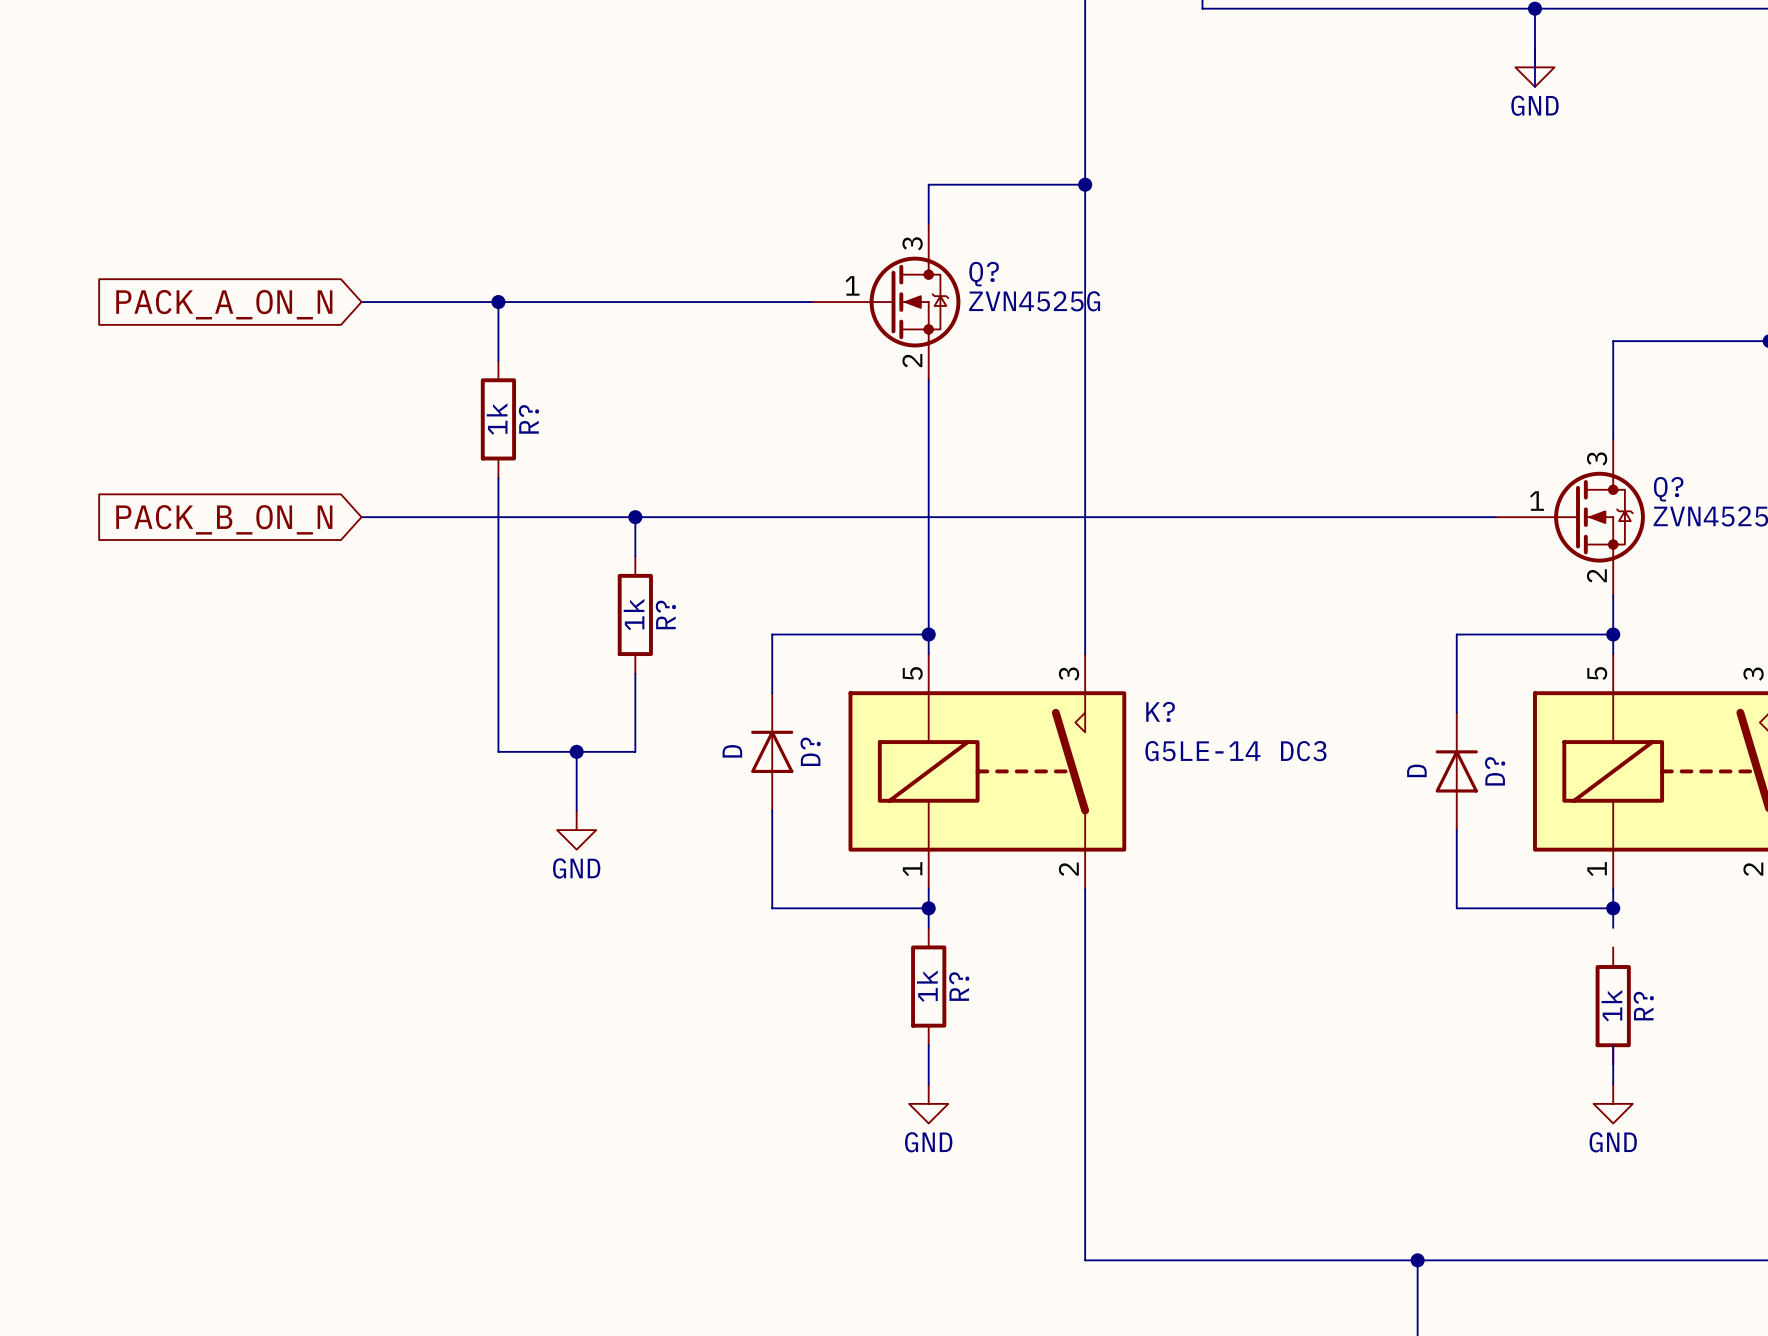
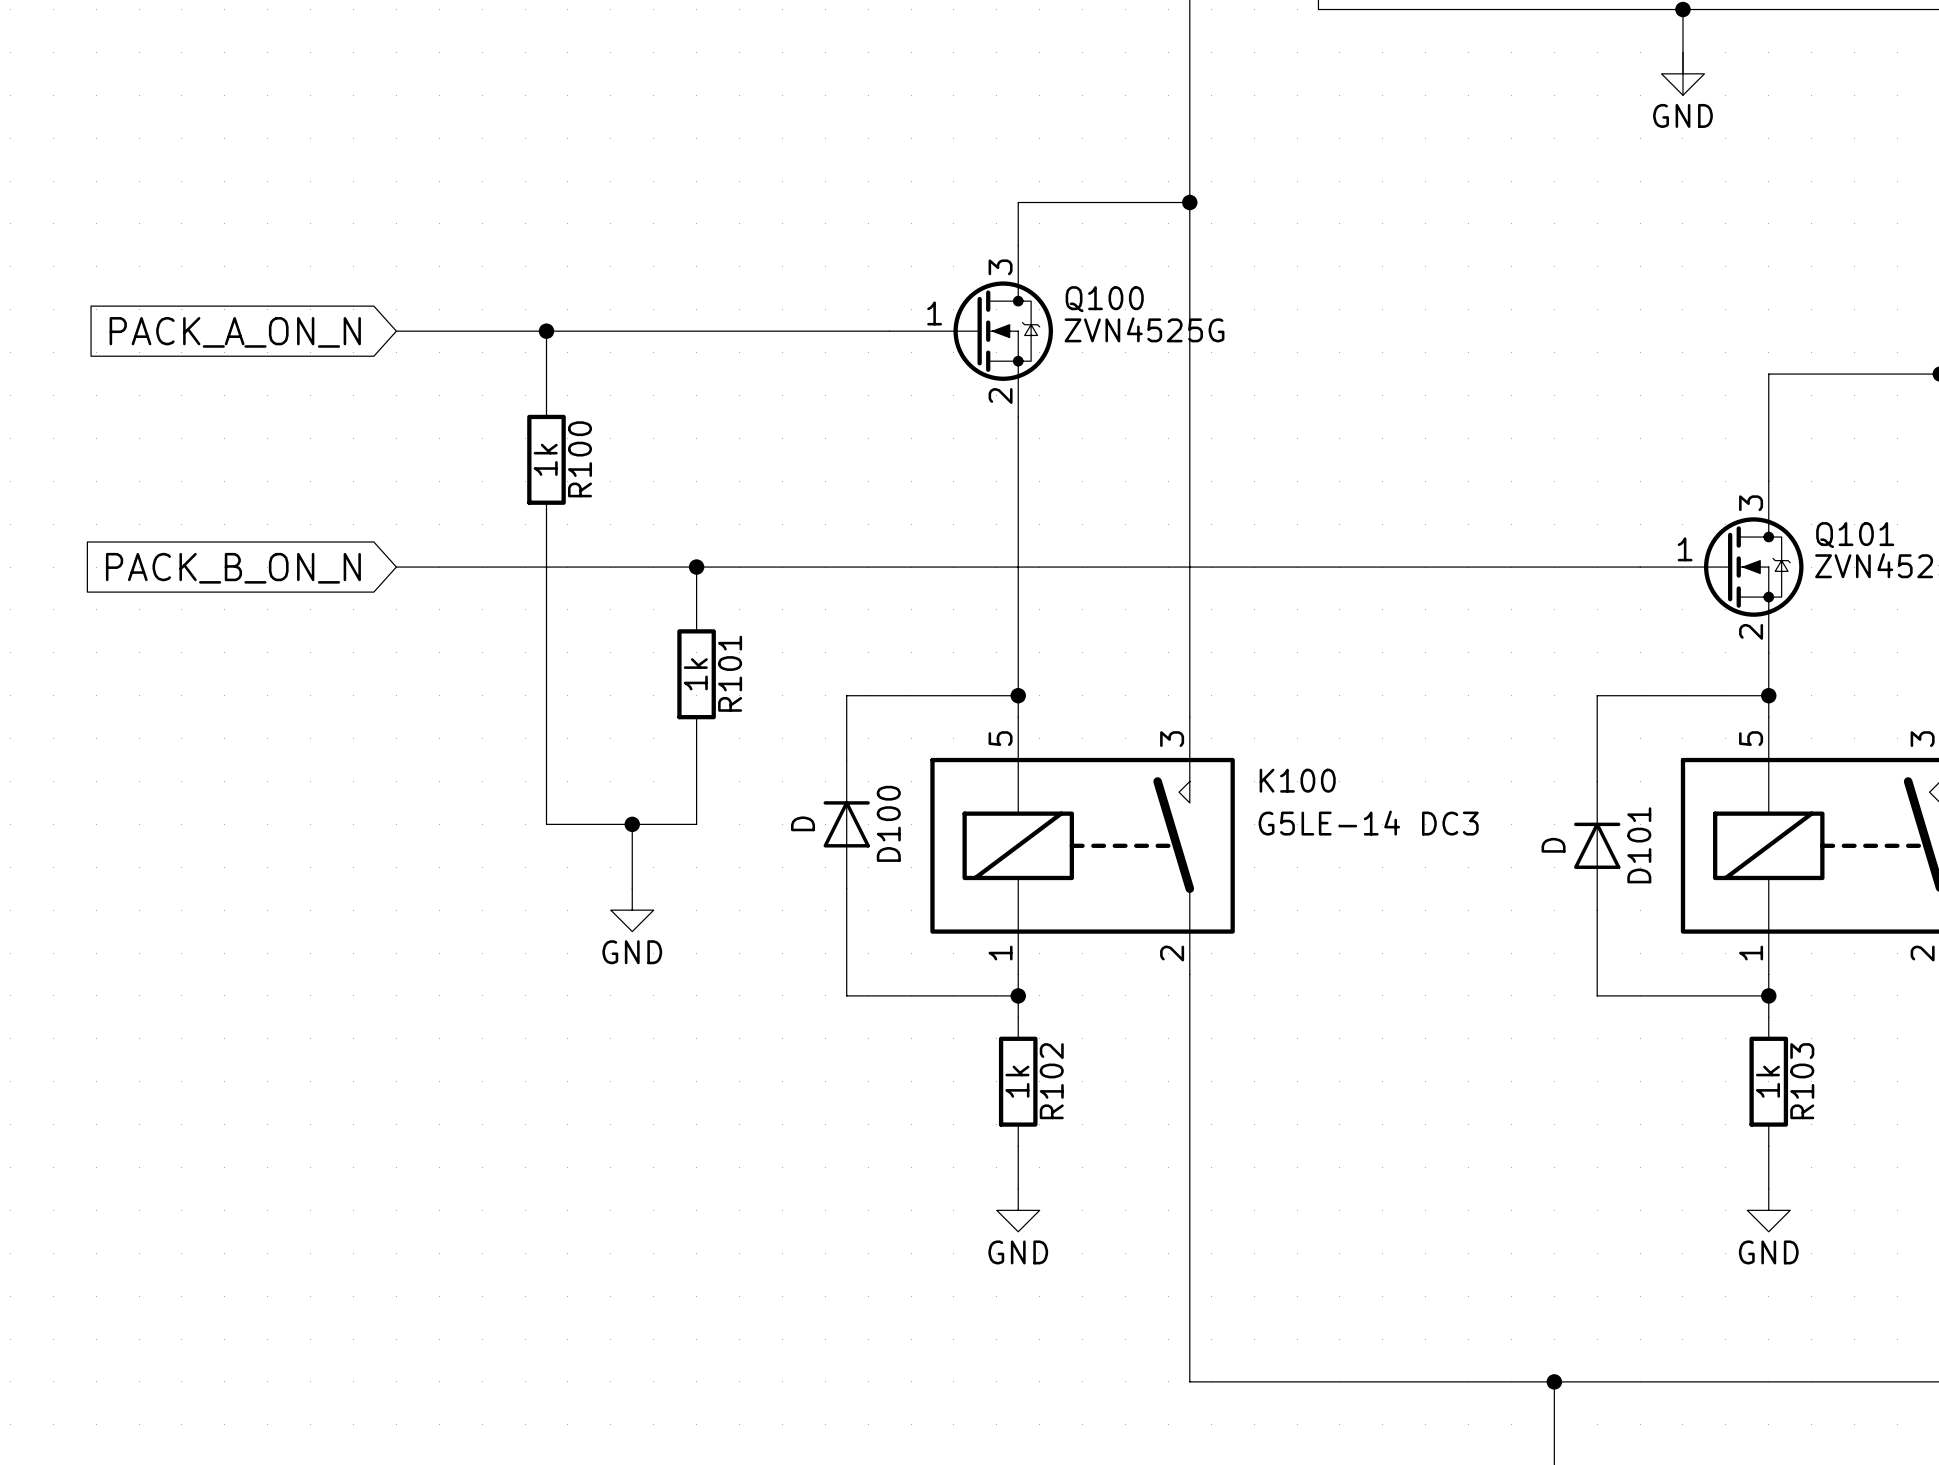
Q? name: Q? (984, 274) -> Q100 (1104, 299)
R? name: R? (528, 419) -> R100 (580, 459)
Q? name: Q? (1668, 489) -> Q101 (1855, 535)
R? name: R? (665, 614) -> R101 (730, 673)
K? name: K? (1160, 711) -> K100 (1297, 780)
D? name: D? (810, 751) -> D100 (888, 823)
D? name: D? (1495, 771) -> D101 (1639, 845)
R? name: R? (959, 986) -> R102 (1051, 1081)
R103: none -> 1k (1768, 1081)
R?: 1k (1613, 1006) -> none

